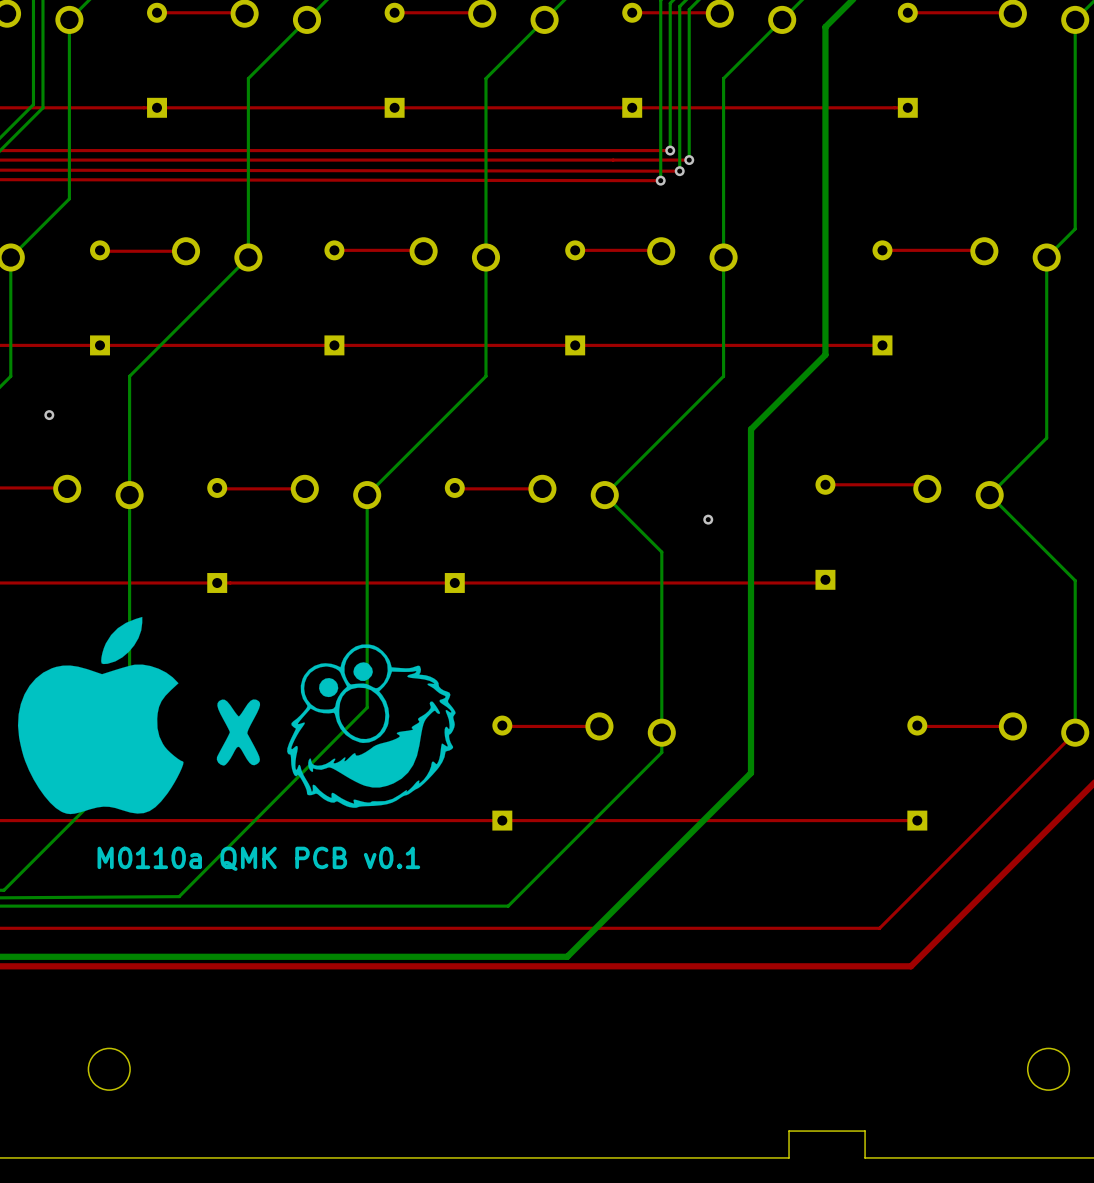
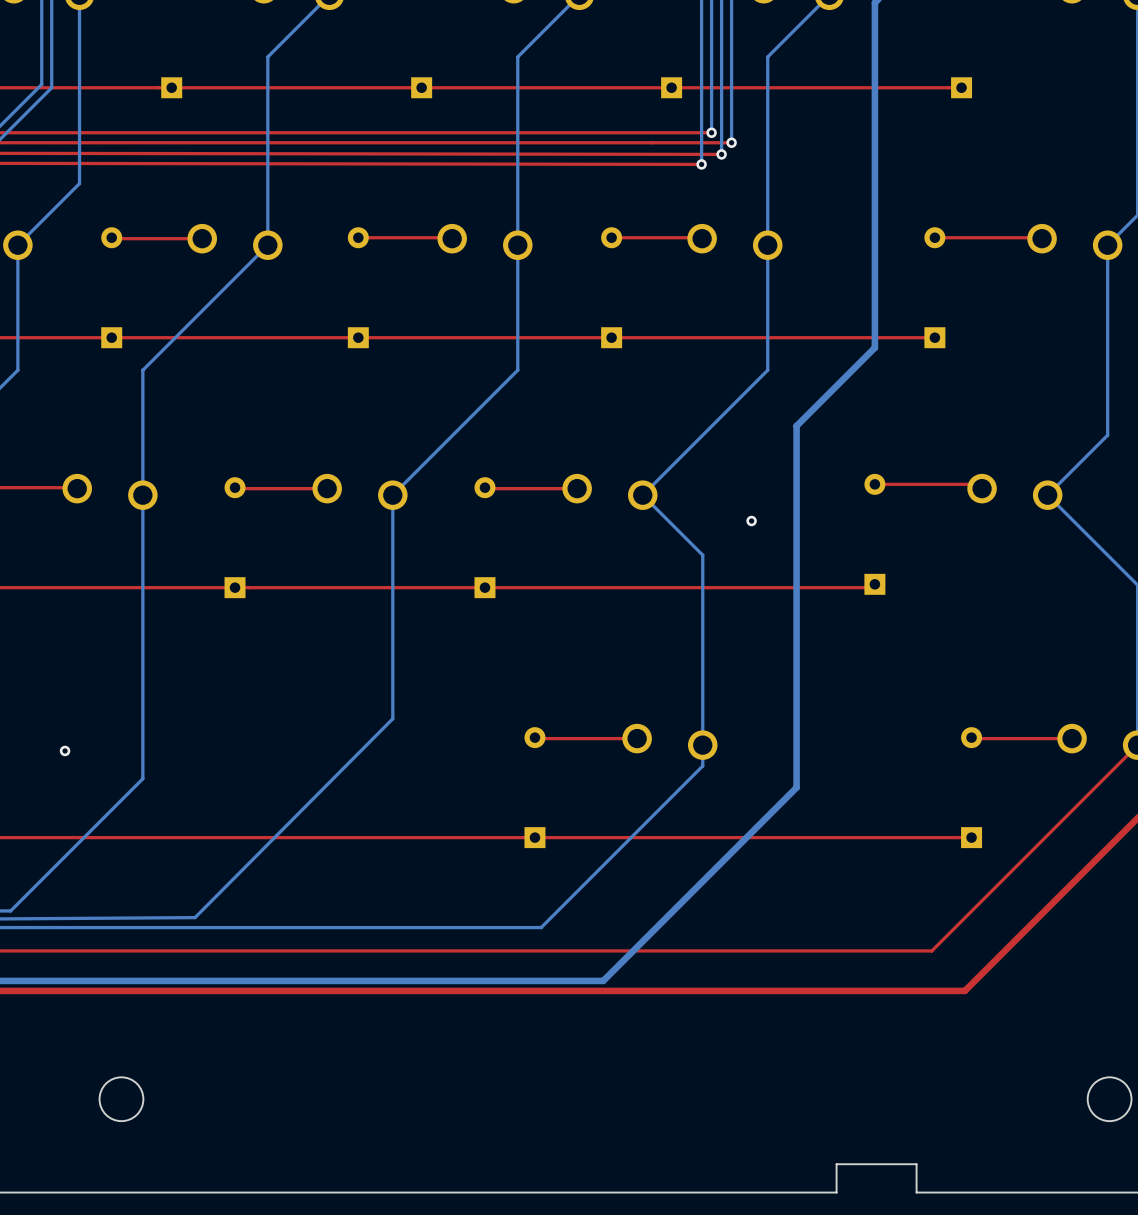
via: (49, 415) -> none
drawing: [17, 616, 456, 815] -> none
via: none -> (65, 750)
text: M0110a QMK PCB v0.1 (258, 858) -> none

